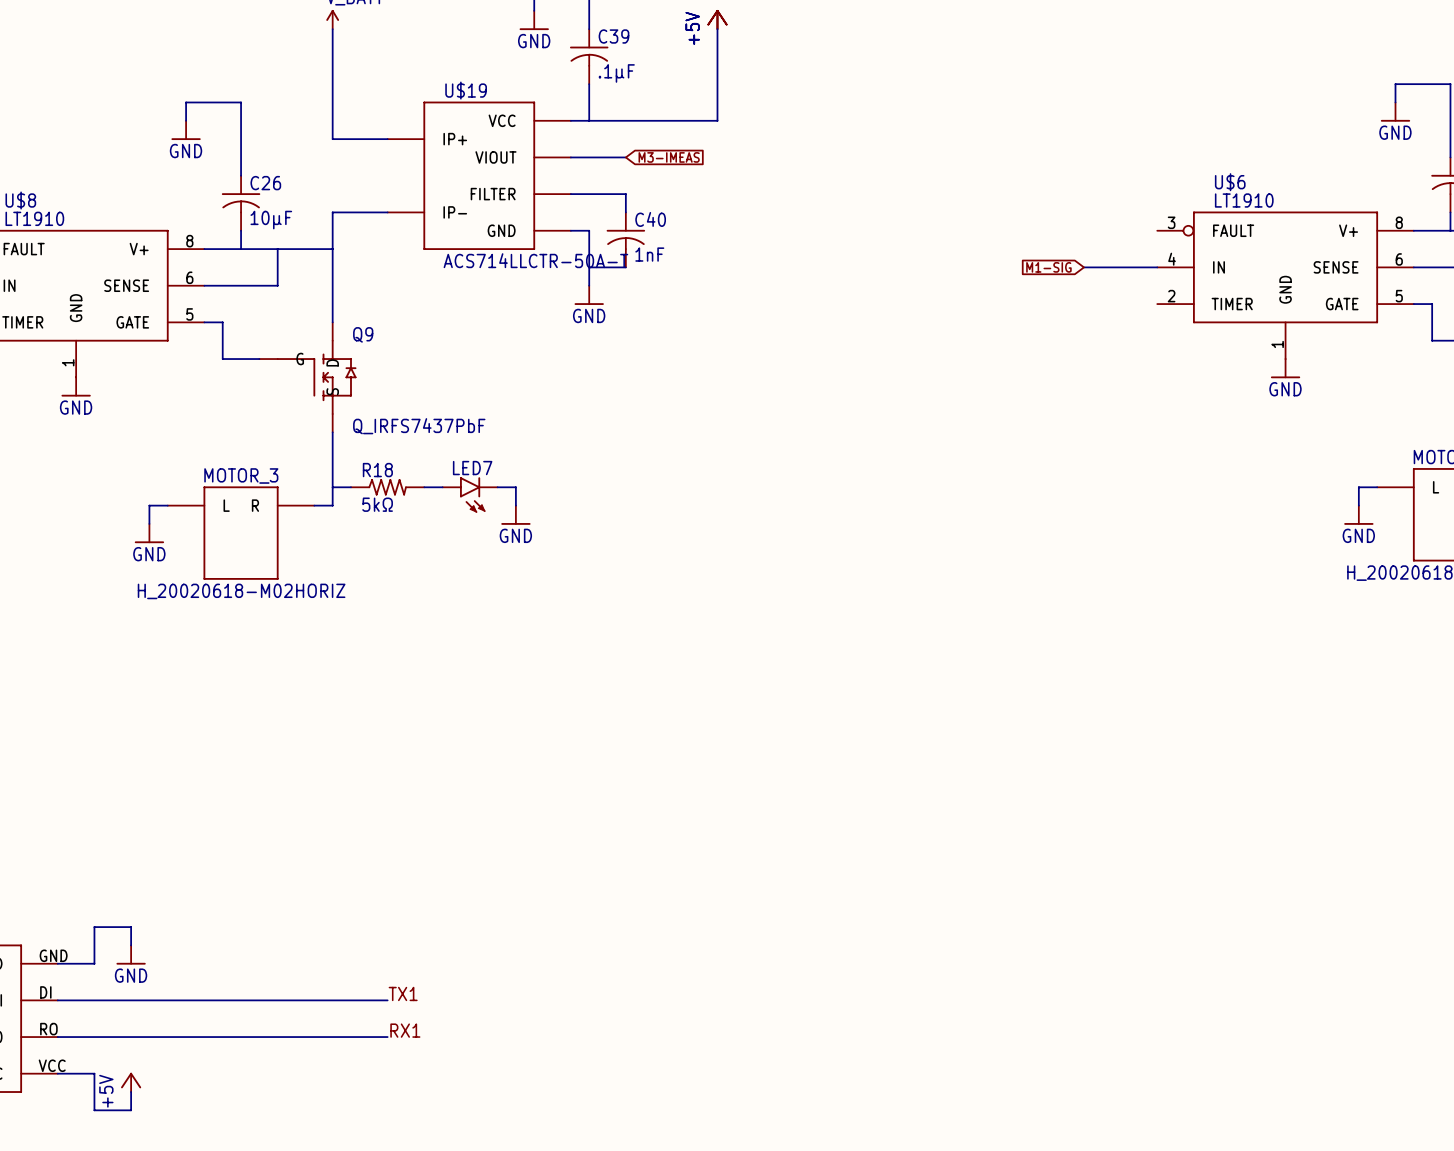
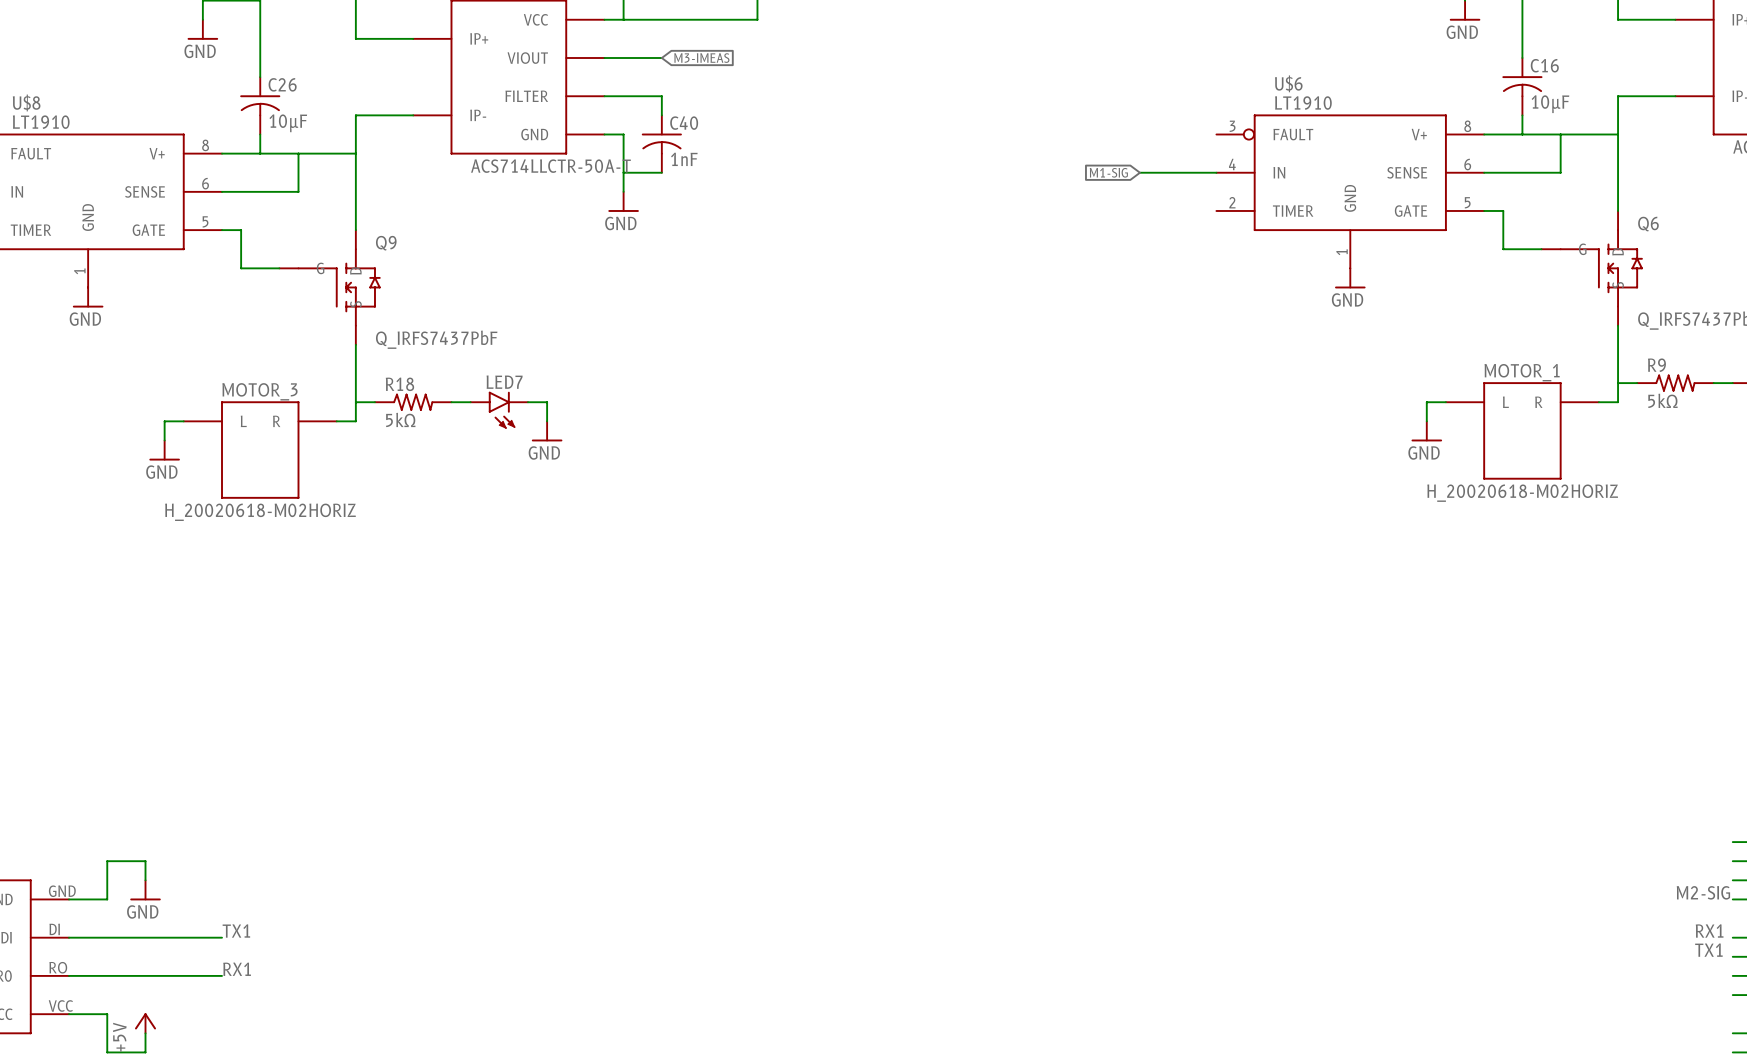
label: none -> TX1 (236, 931)
label: TX1 (403, 993) -> none
wire: (204, 1000) (387, 1000) -> none
label: none -> RX1 (237, 969)
label: RX1 (405, 1030) -> none
wire: (204, 1037) (387, 1037) -> none

